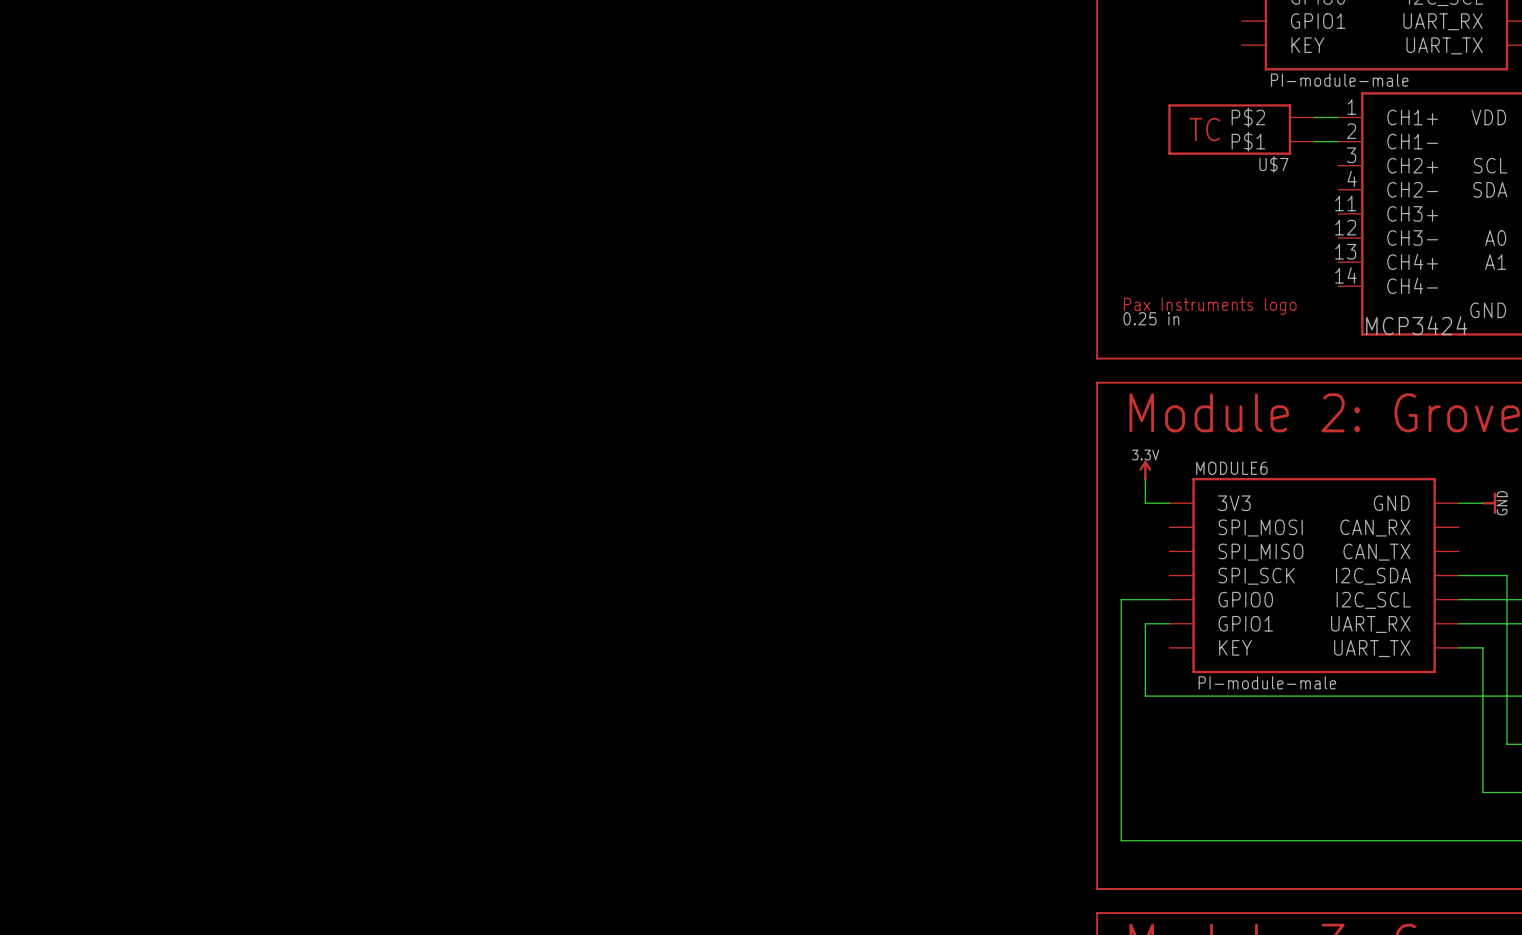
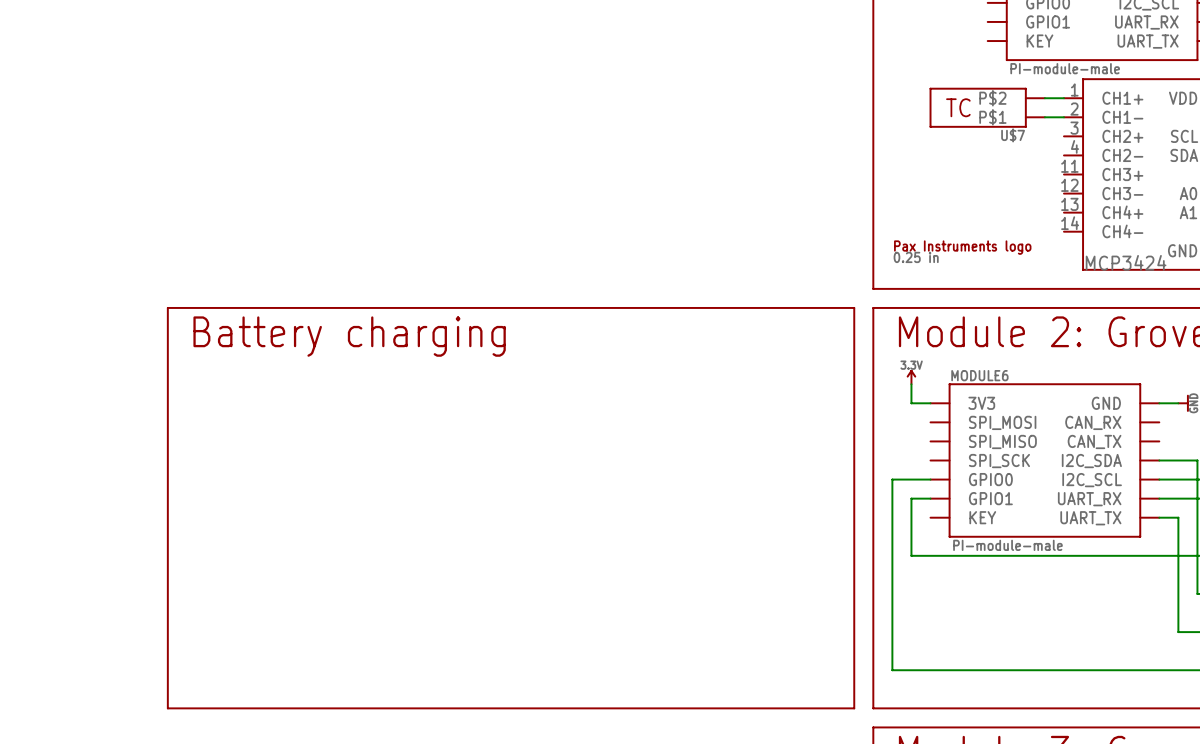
line: none -> (167, 307) (854, 307) (854, 708) (167, 708) (167, 307)
text: none -> Battery charging (349, 336)

